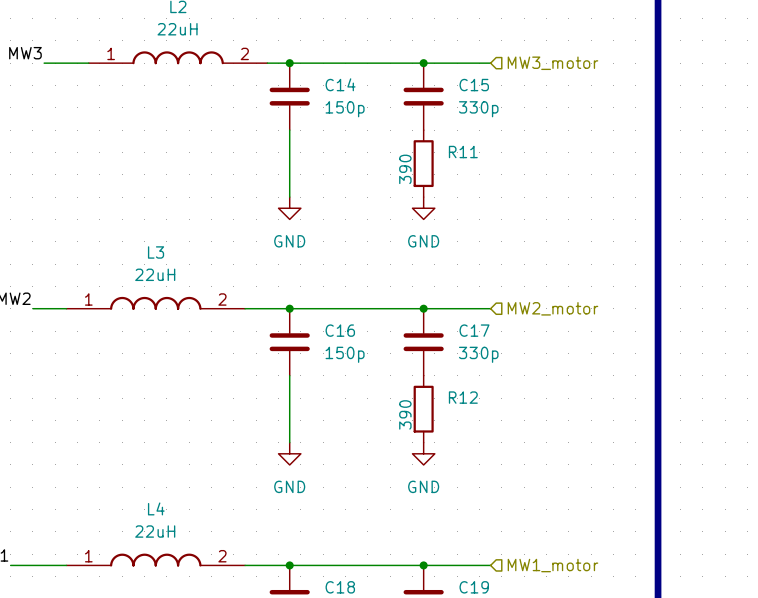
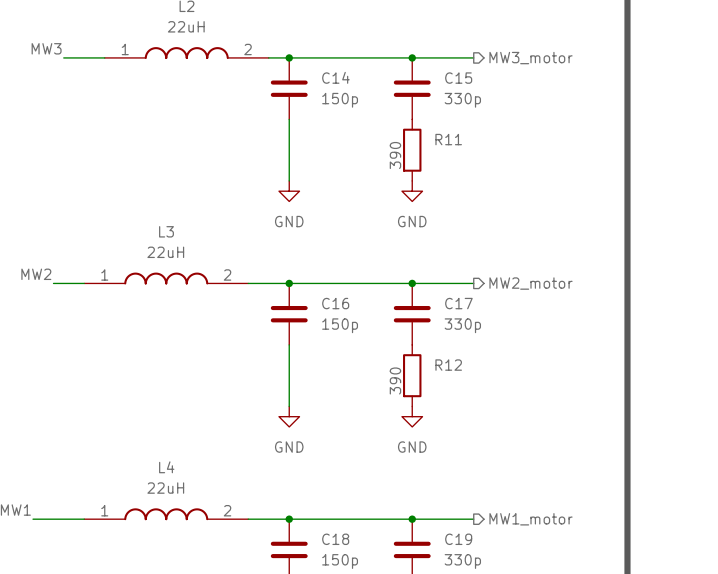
hierarchical label shape: input (552, 63) -> output (531, 58)
hierarchical label shape: input (552, 308) -> output (531, 283)
hierarchical label shape: input (552, 565) -> output (531, 519)

